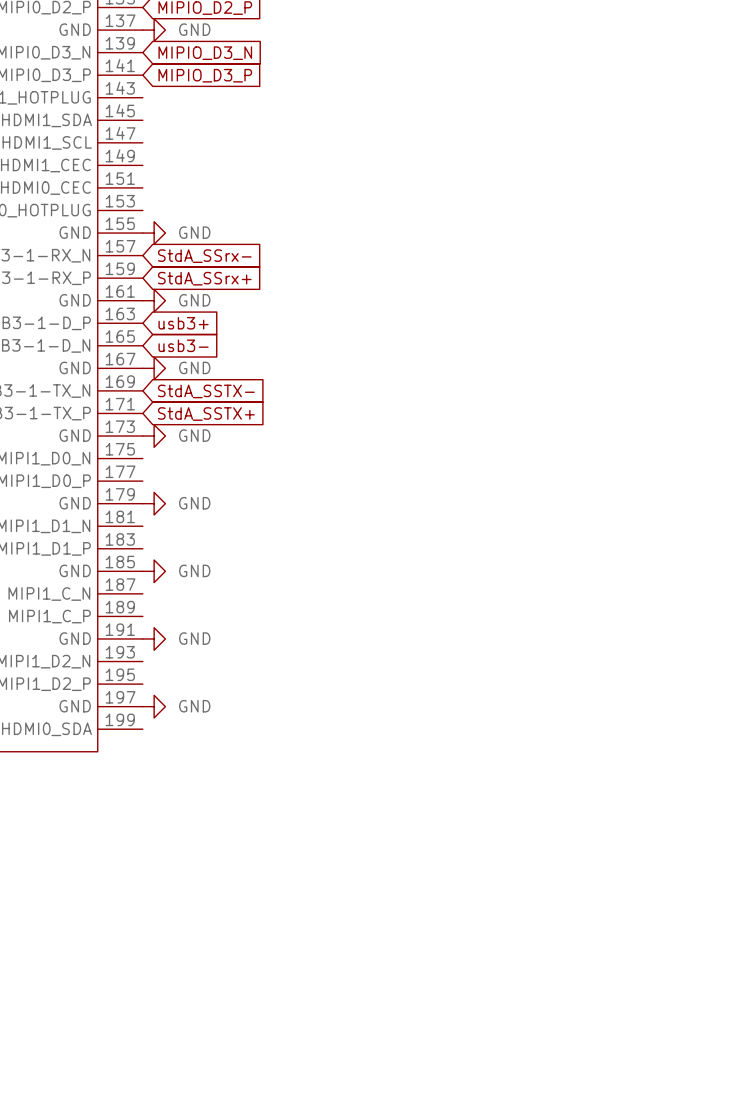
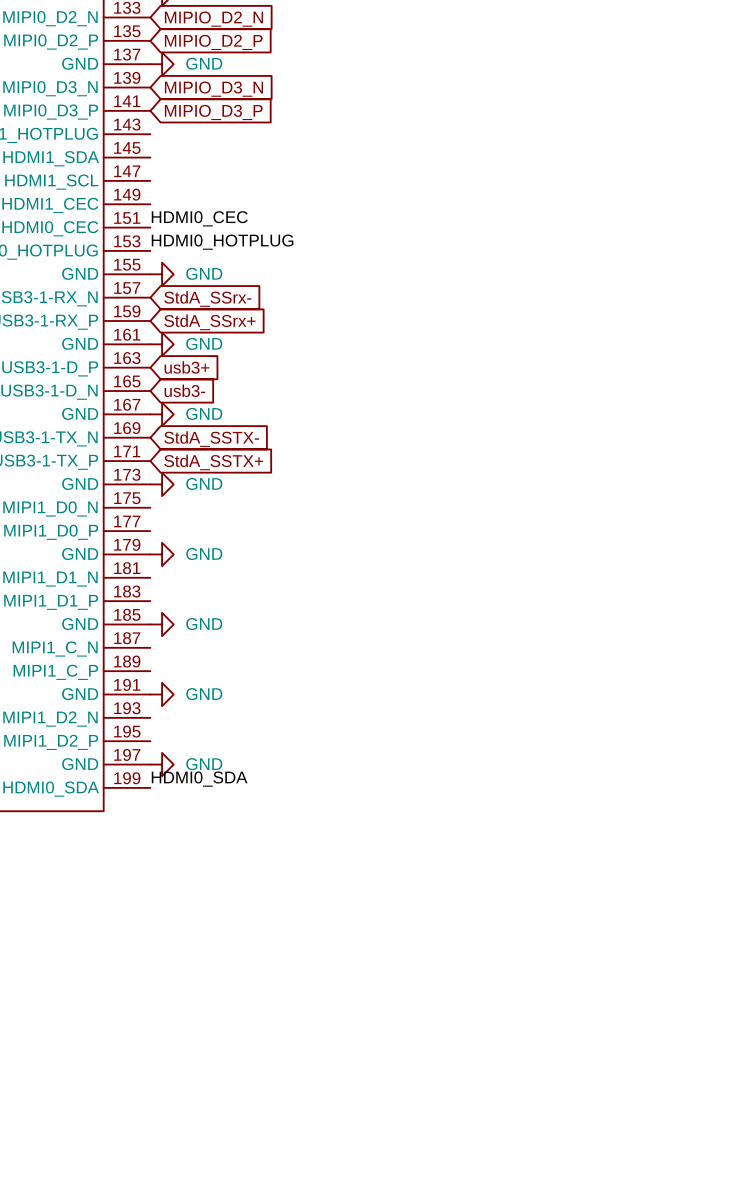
label: none -> HDMI0_CEC (199, 218)
label: none -> HDMI0_HOTPLUG (222, 242)
label: none -> HDMI0_SDA (199, 779)

